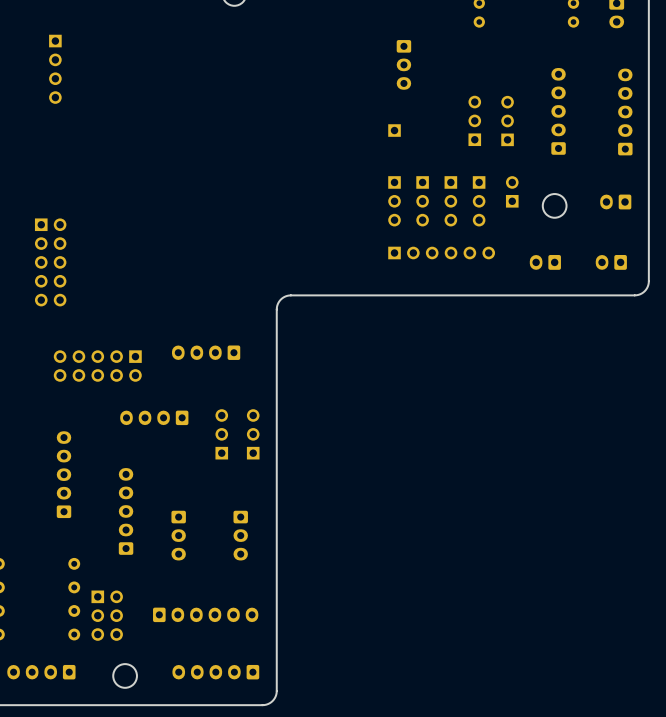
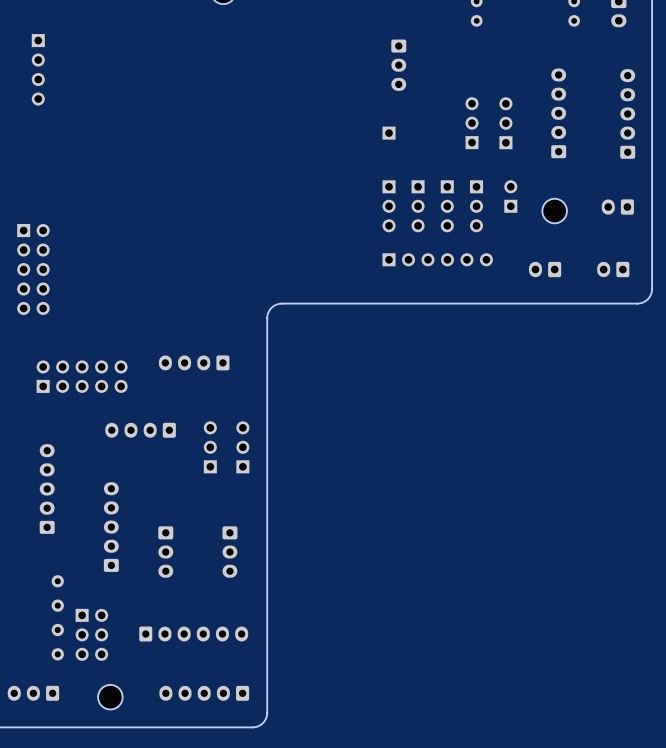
part rotation: 0° (97, 366) -> 180° (82, 376)

